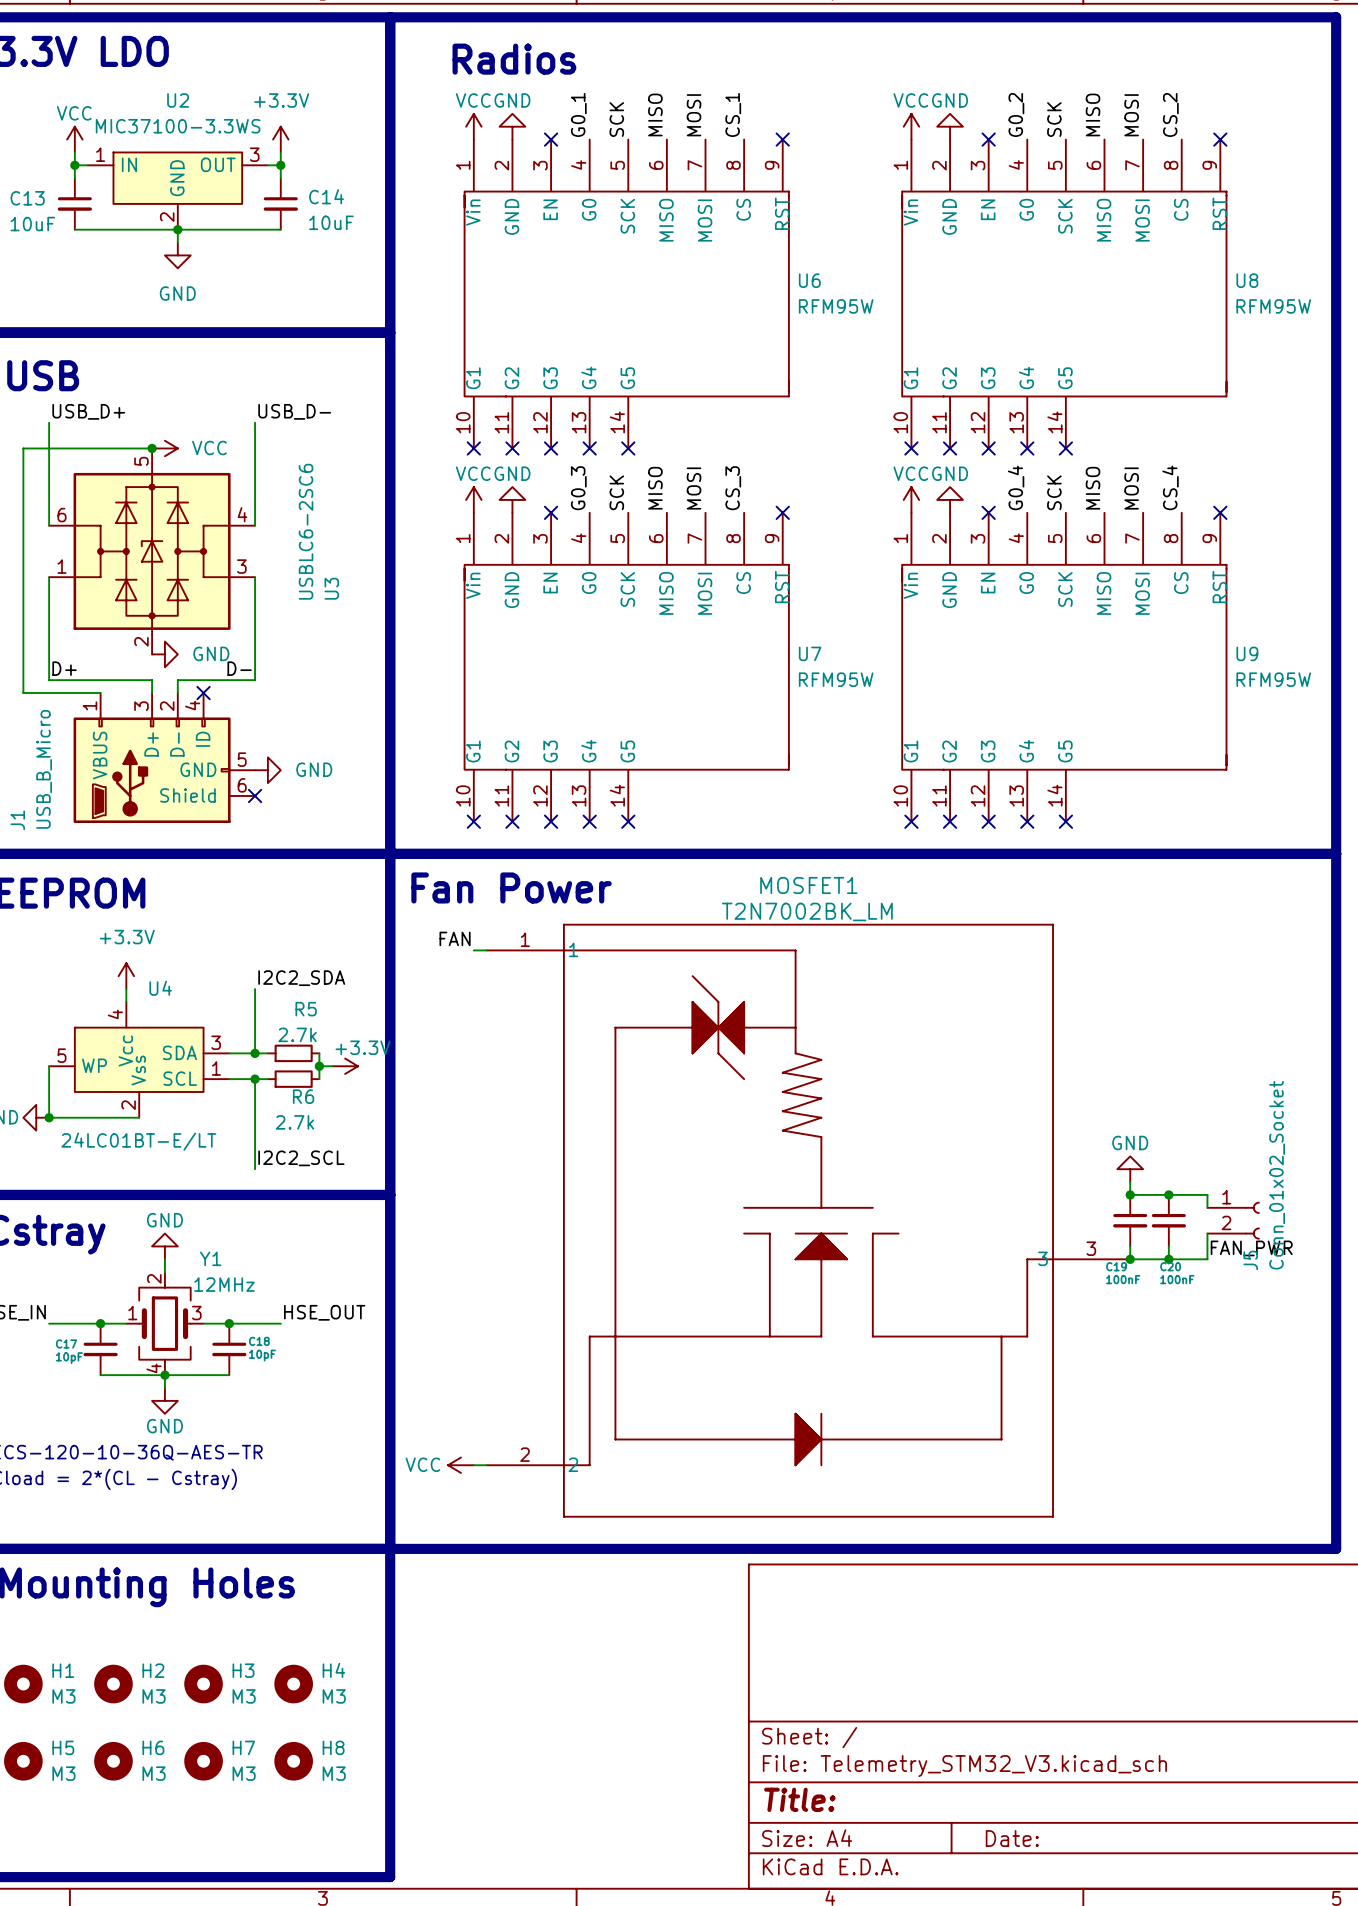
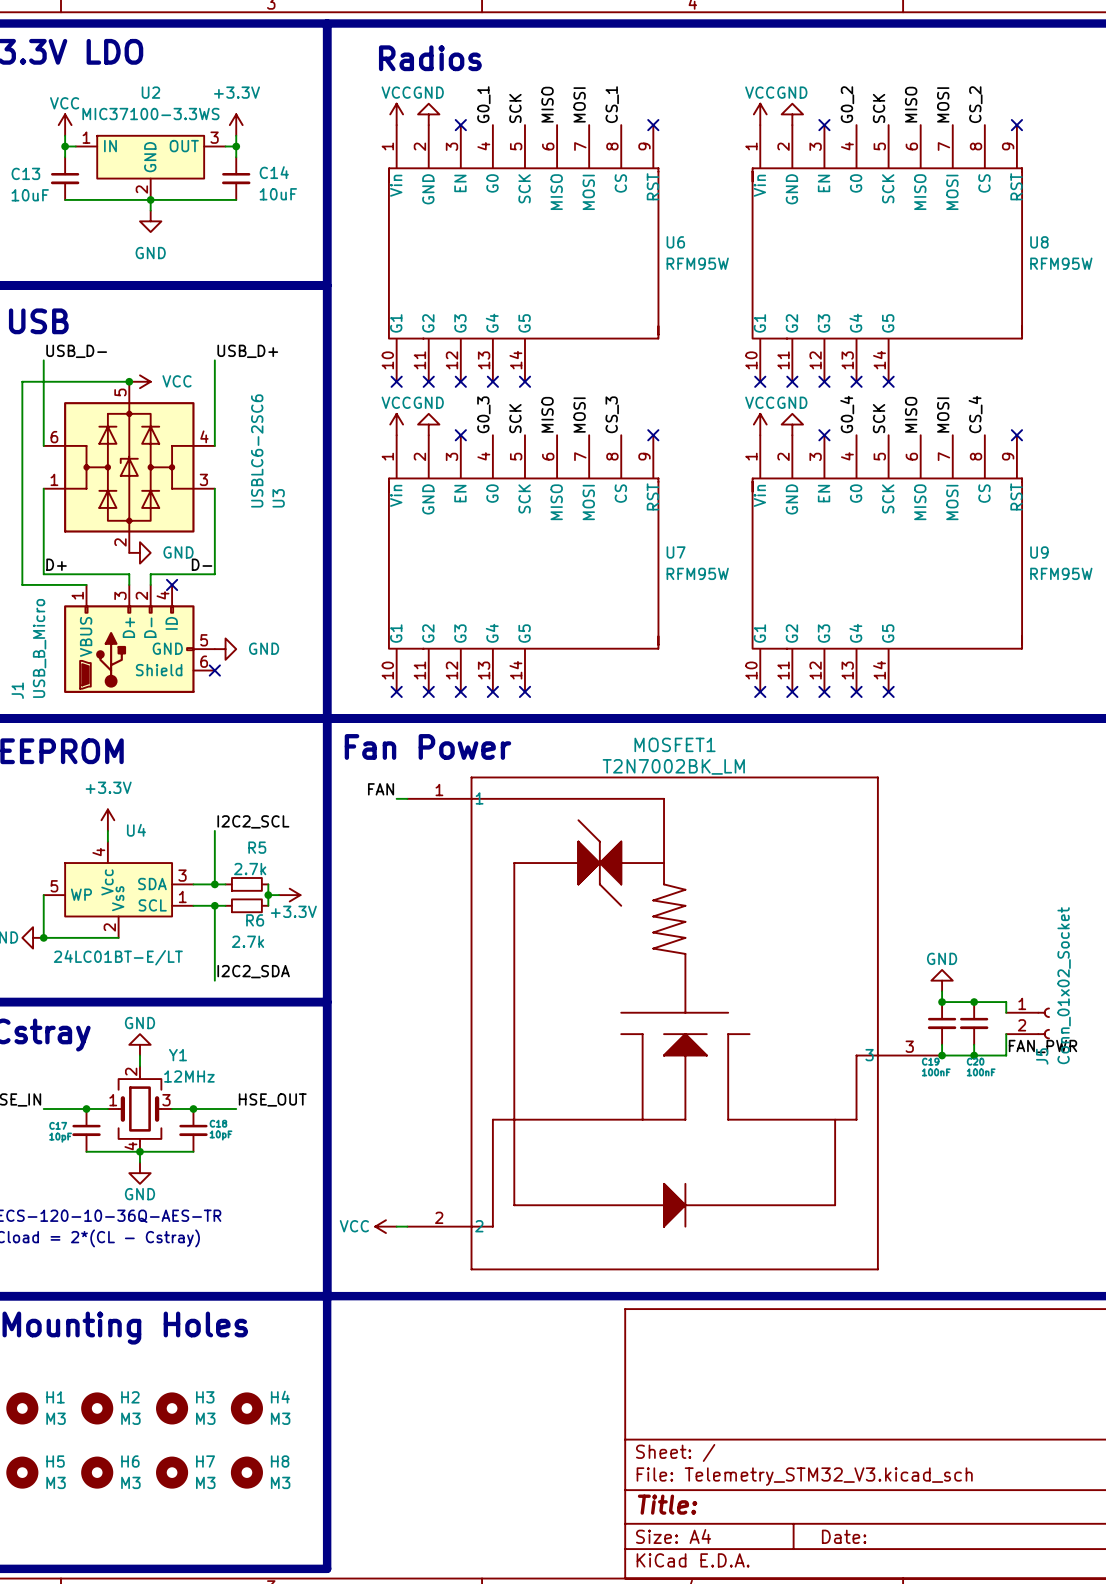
label: USB_D+ (88, 411) -> USB_D- (76, 351)
label: USB_D- (294, 411) -> USB_D+ (247, 351)
label: I2C2_SDA (301, 978) -> I2C2_SCL (253, 821)
power symbol text position: +3.3V (363, 1047) -> +3.3V (293, 911)
label: I2C2_SCL (301, 1158) -> I2C2_SDA (253, 971)

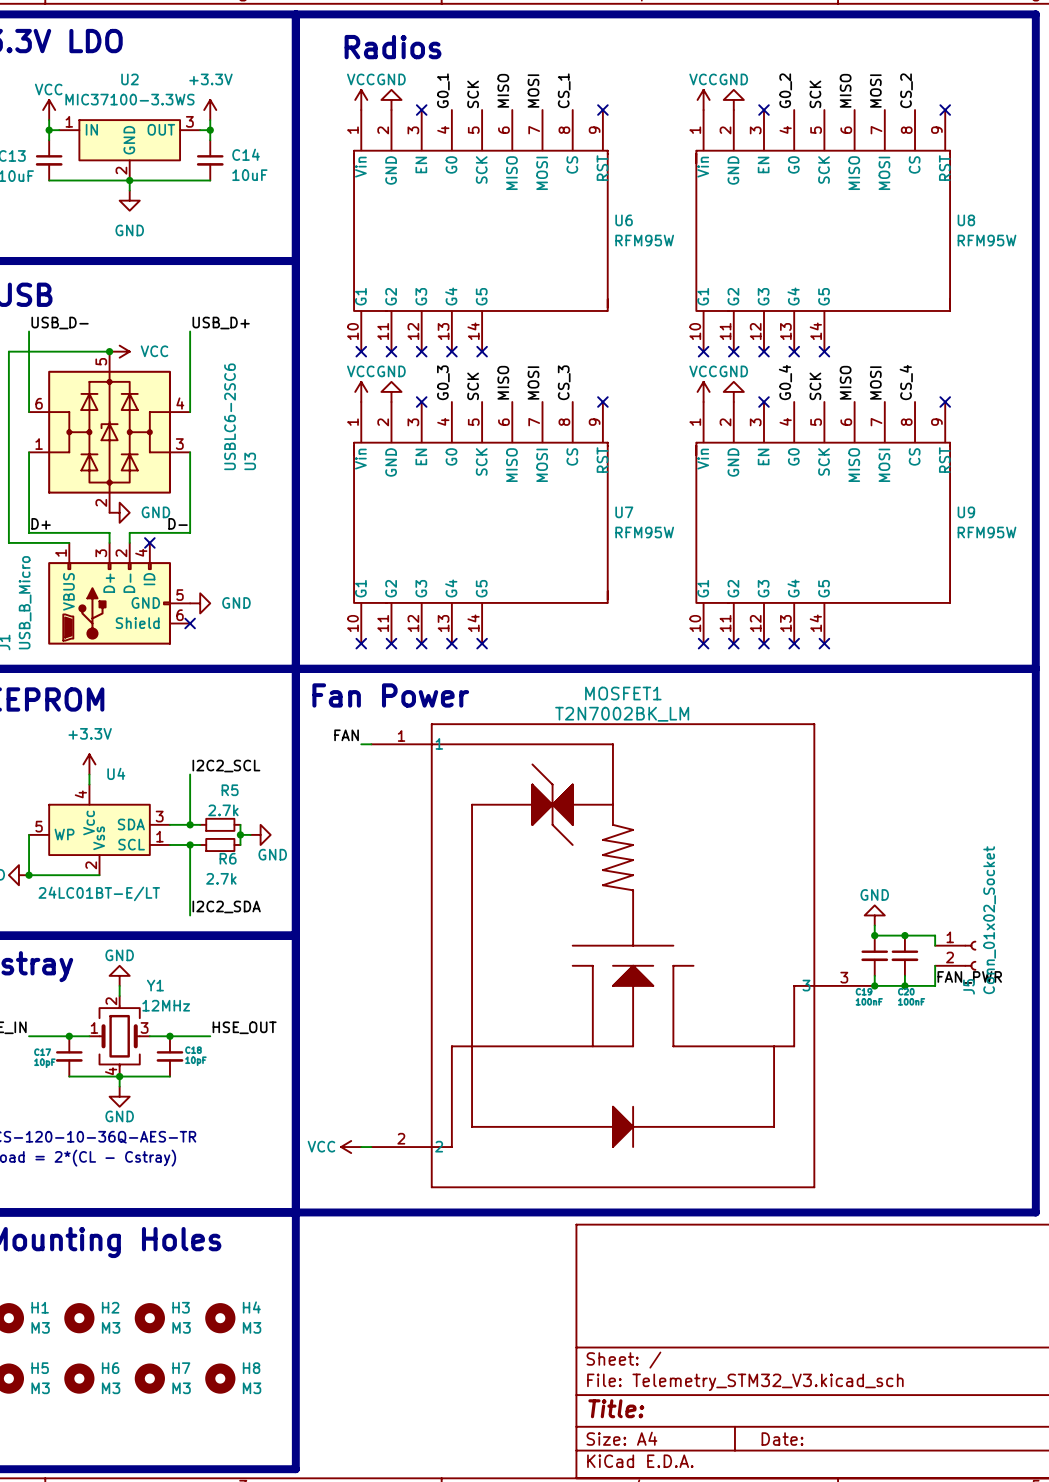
power symbol: +3.3V (289, 895) -> GND (260, 834)

